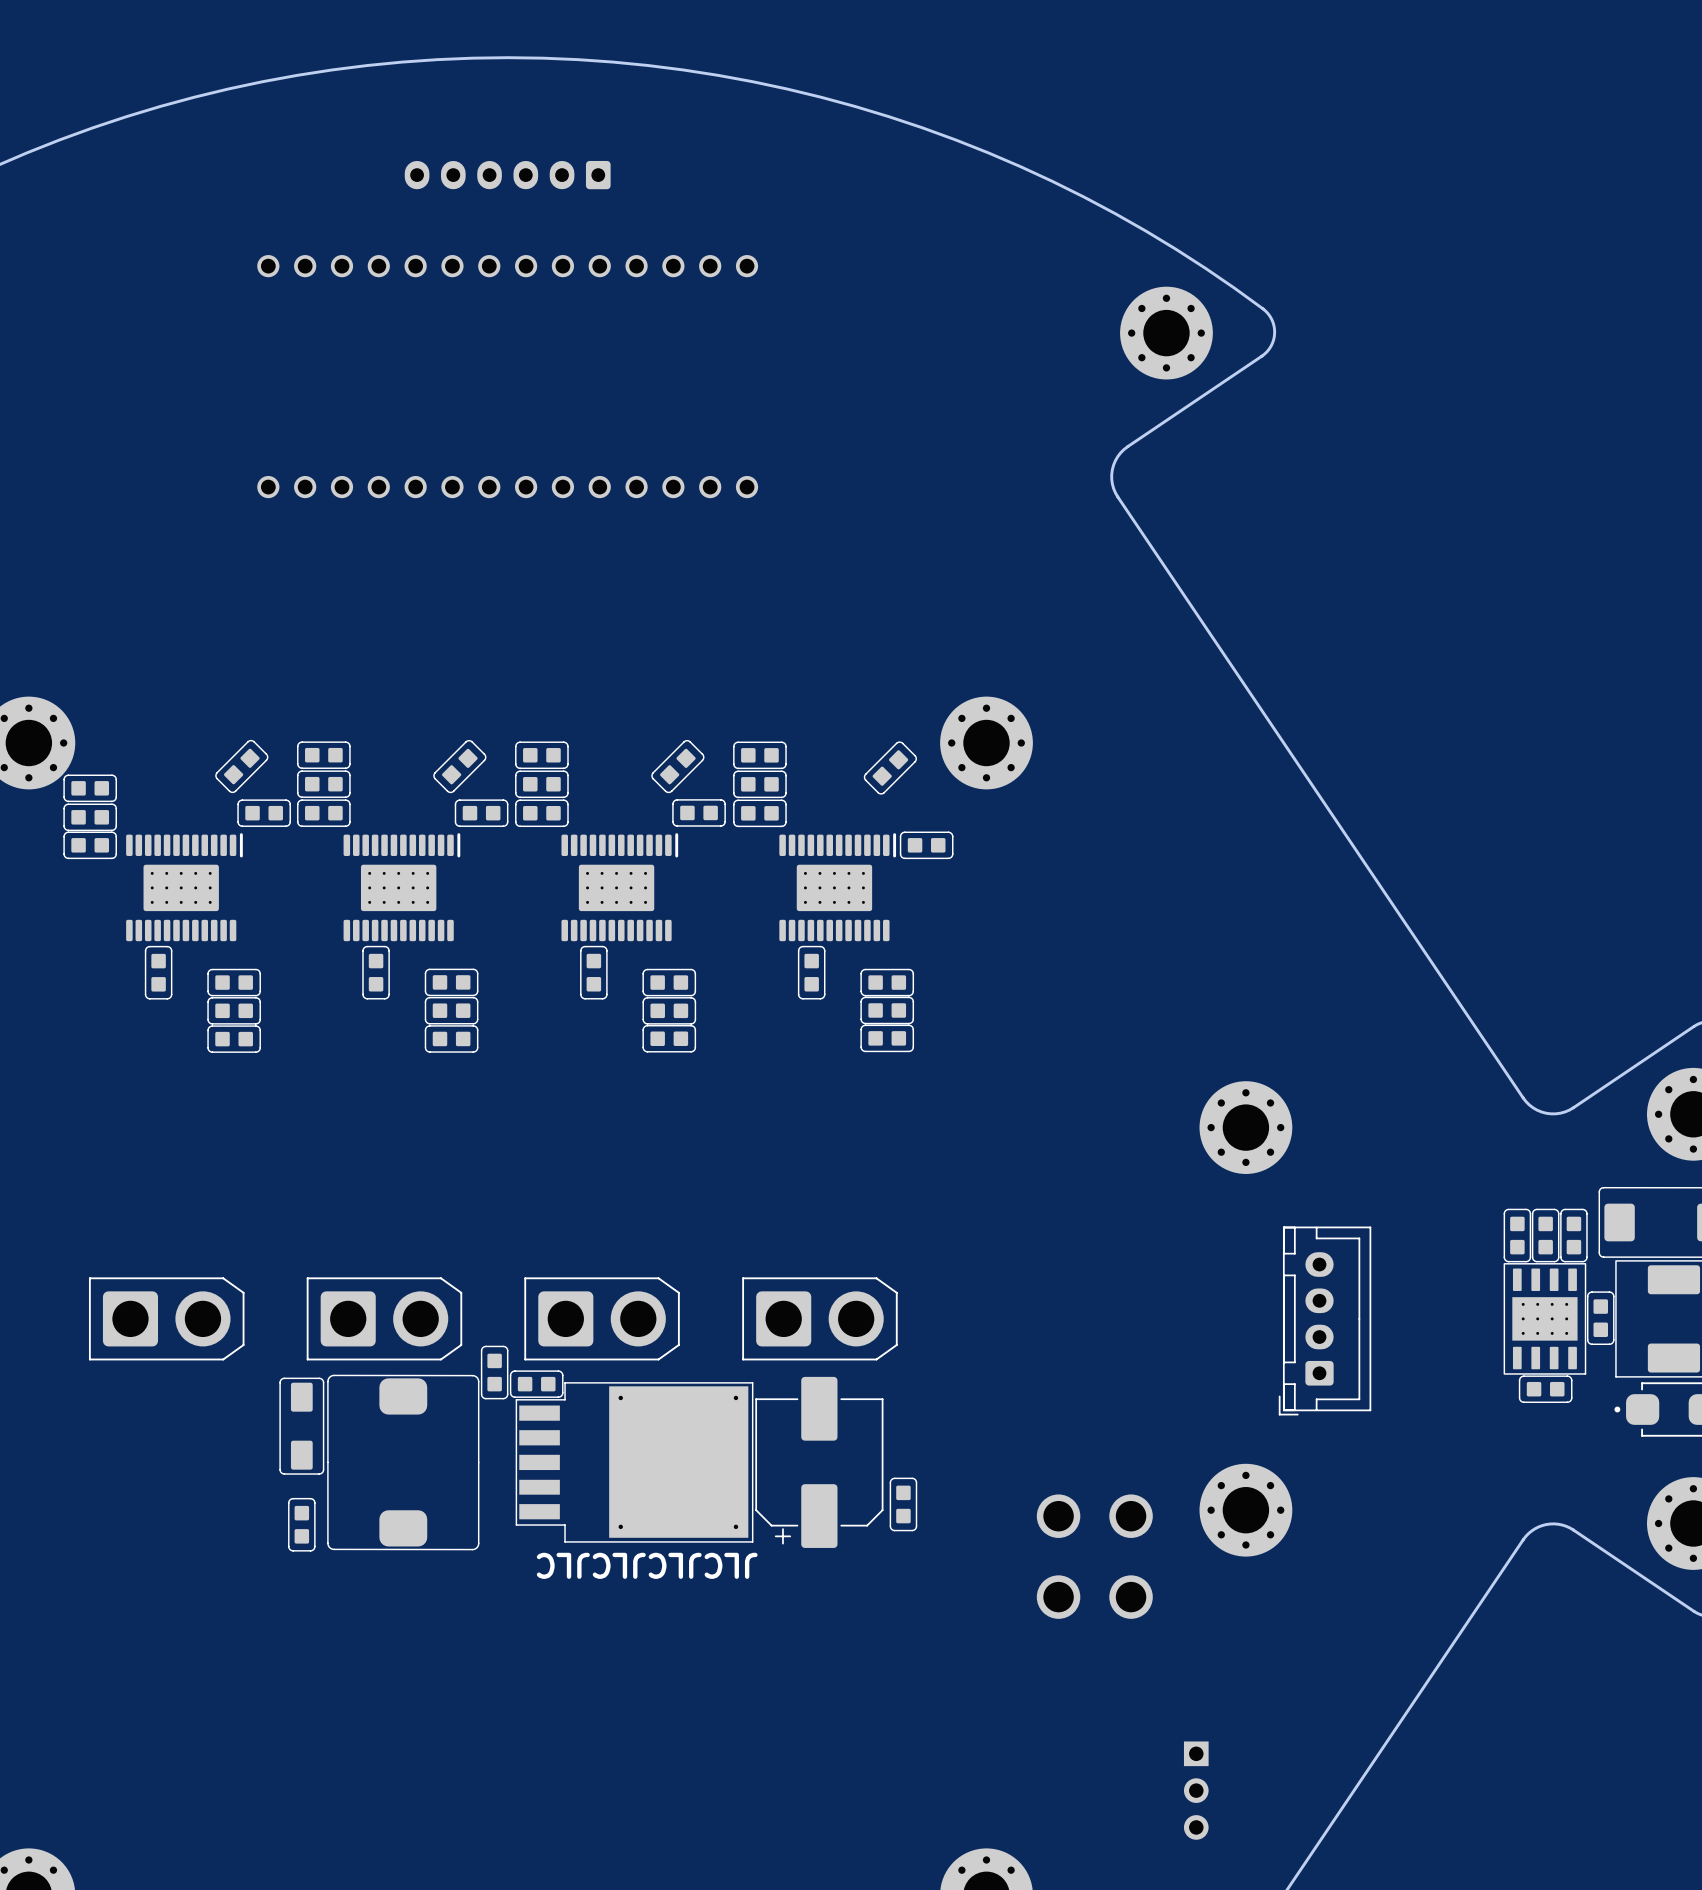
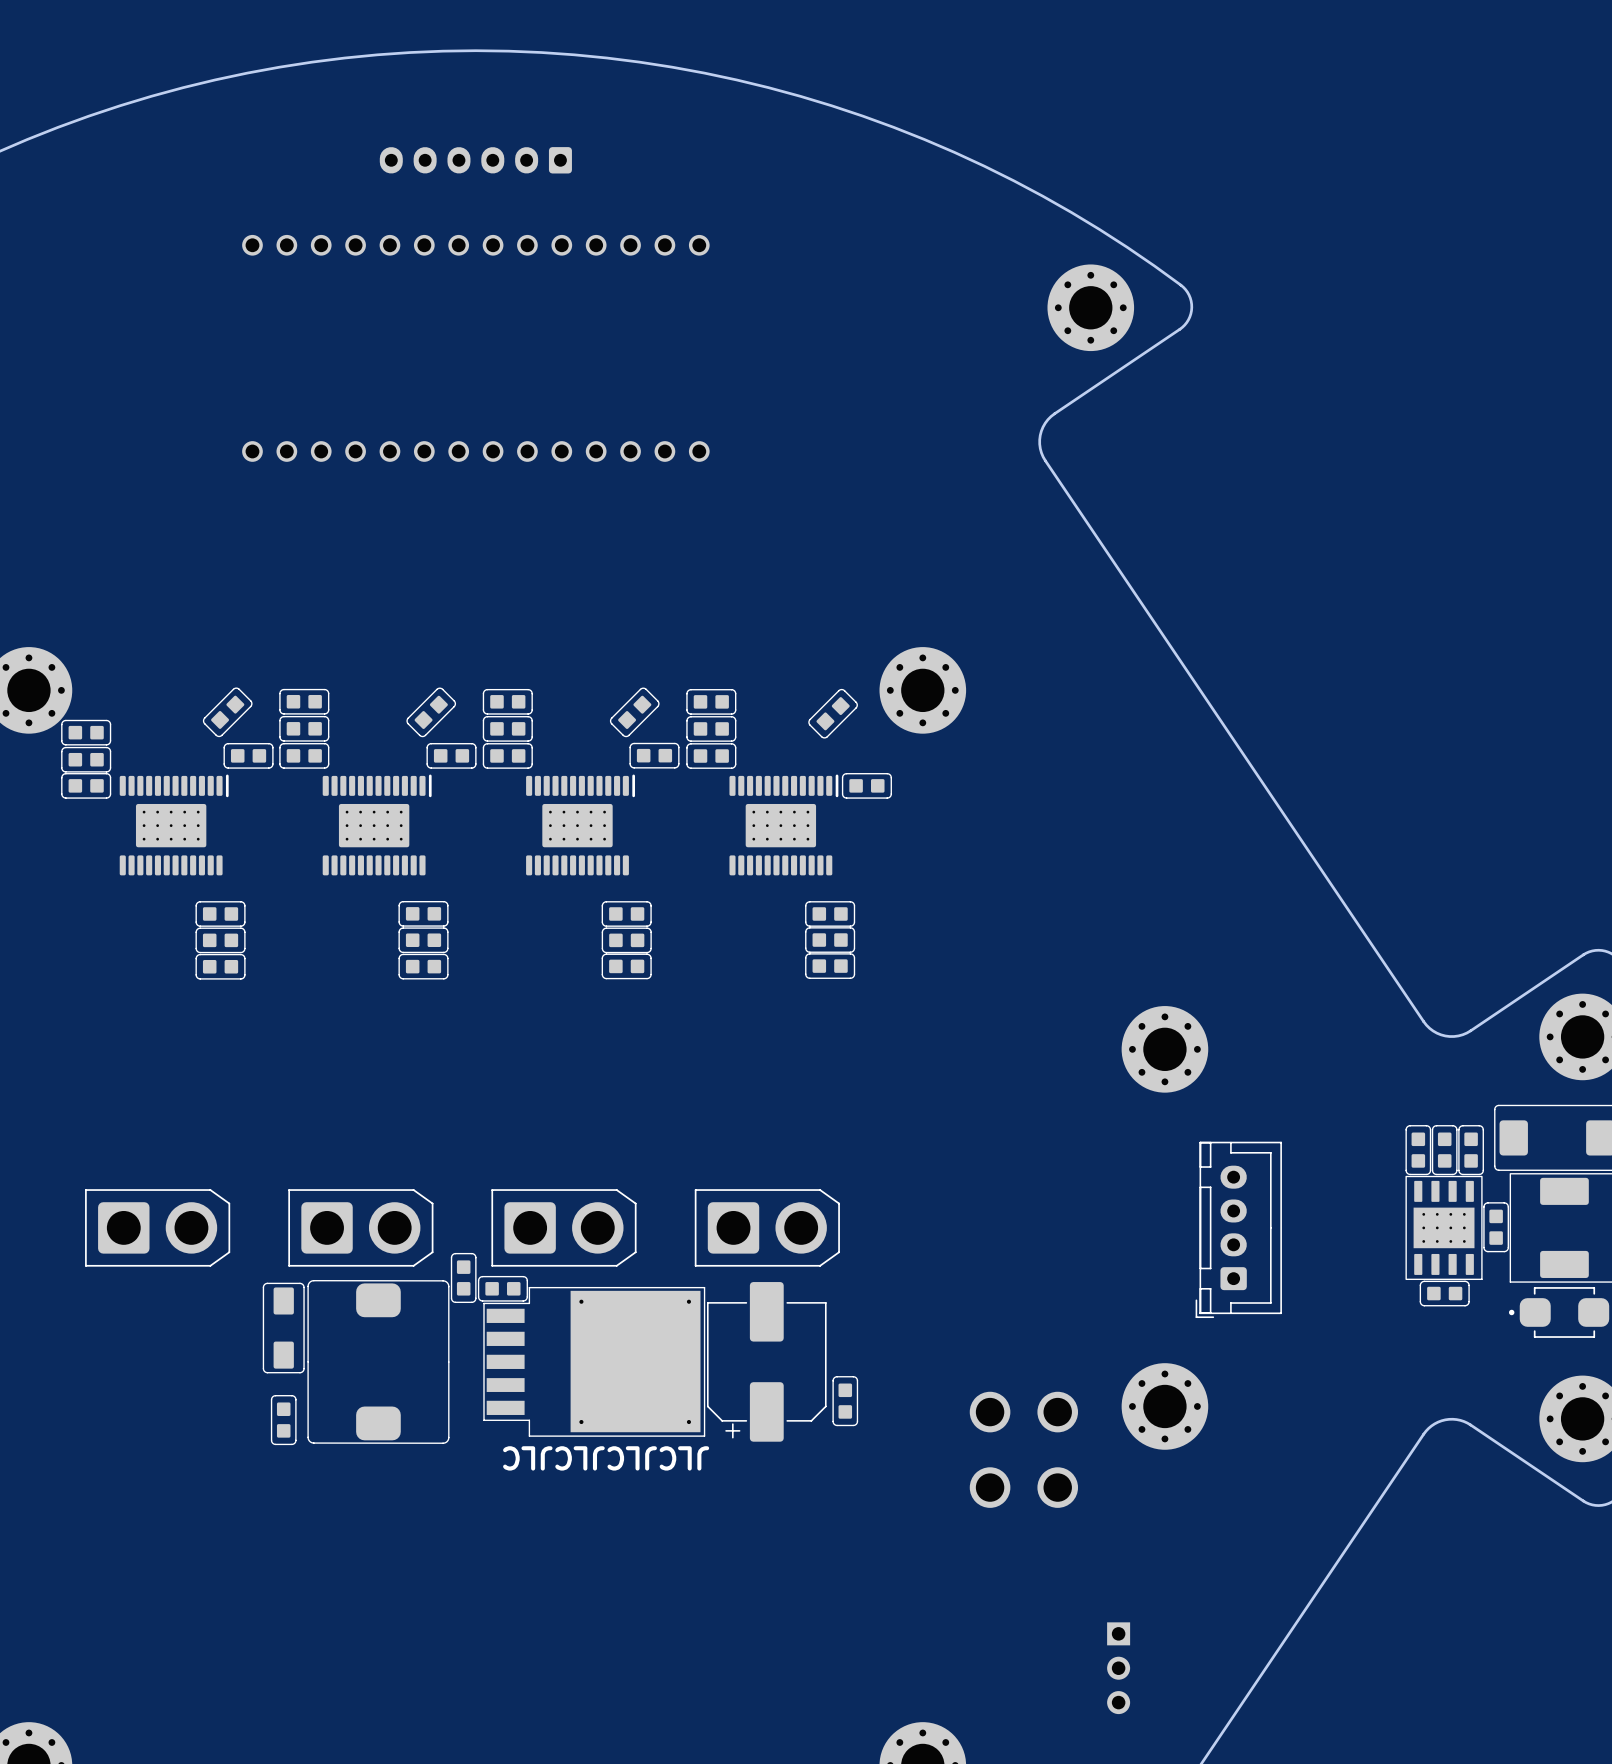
part: (158, 972) -> none
part: (376, 972) -> none
part: (593, 972) -> none
part: (811, 972) -> none

